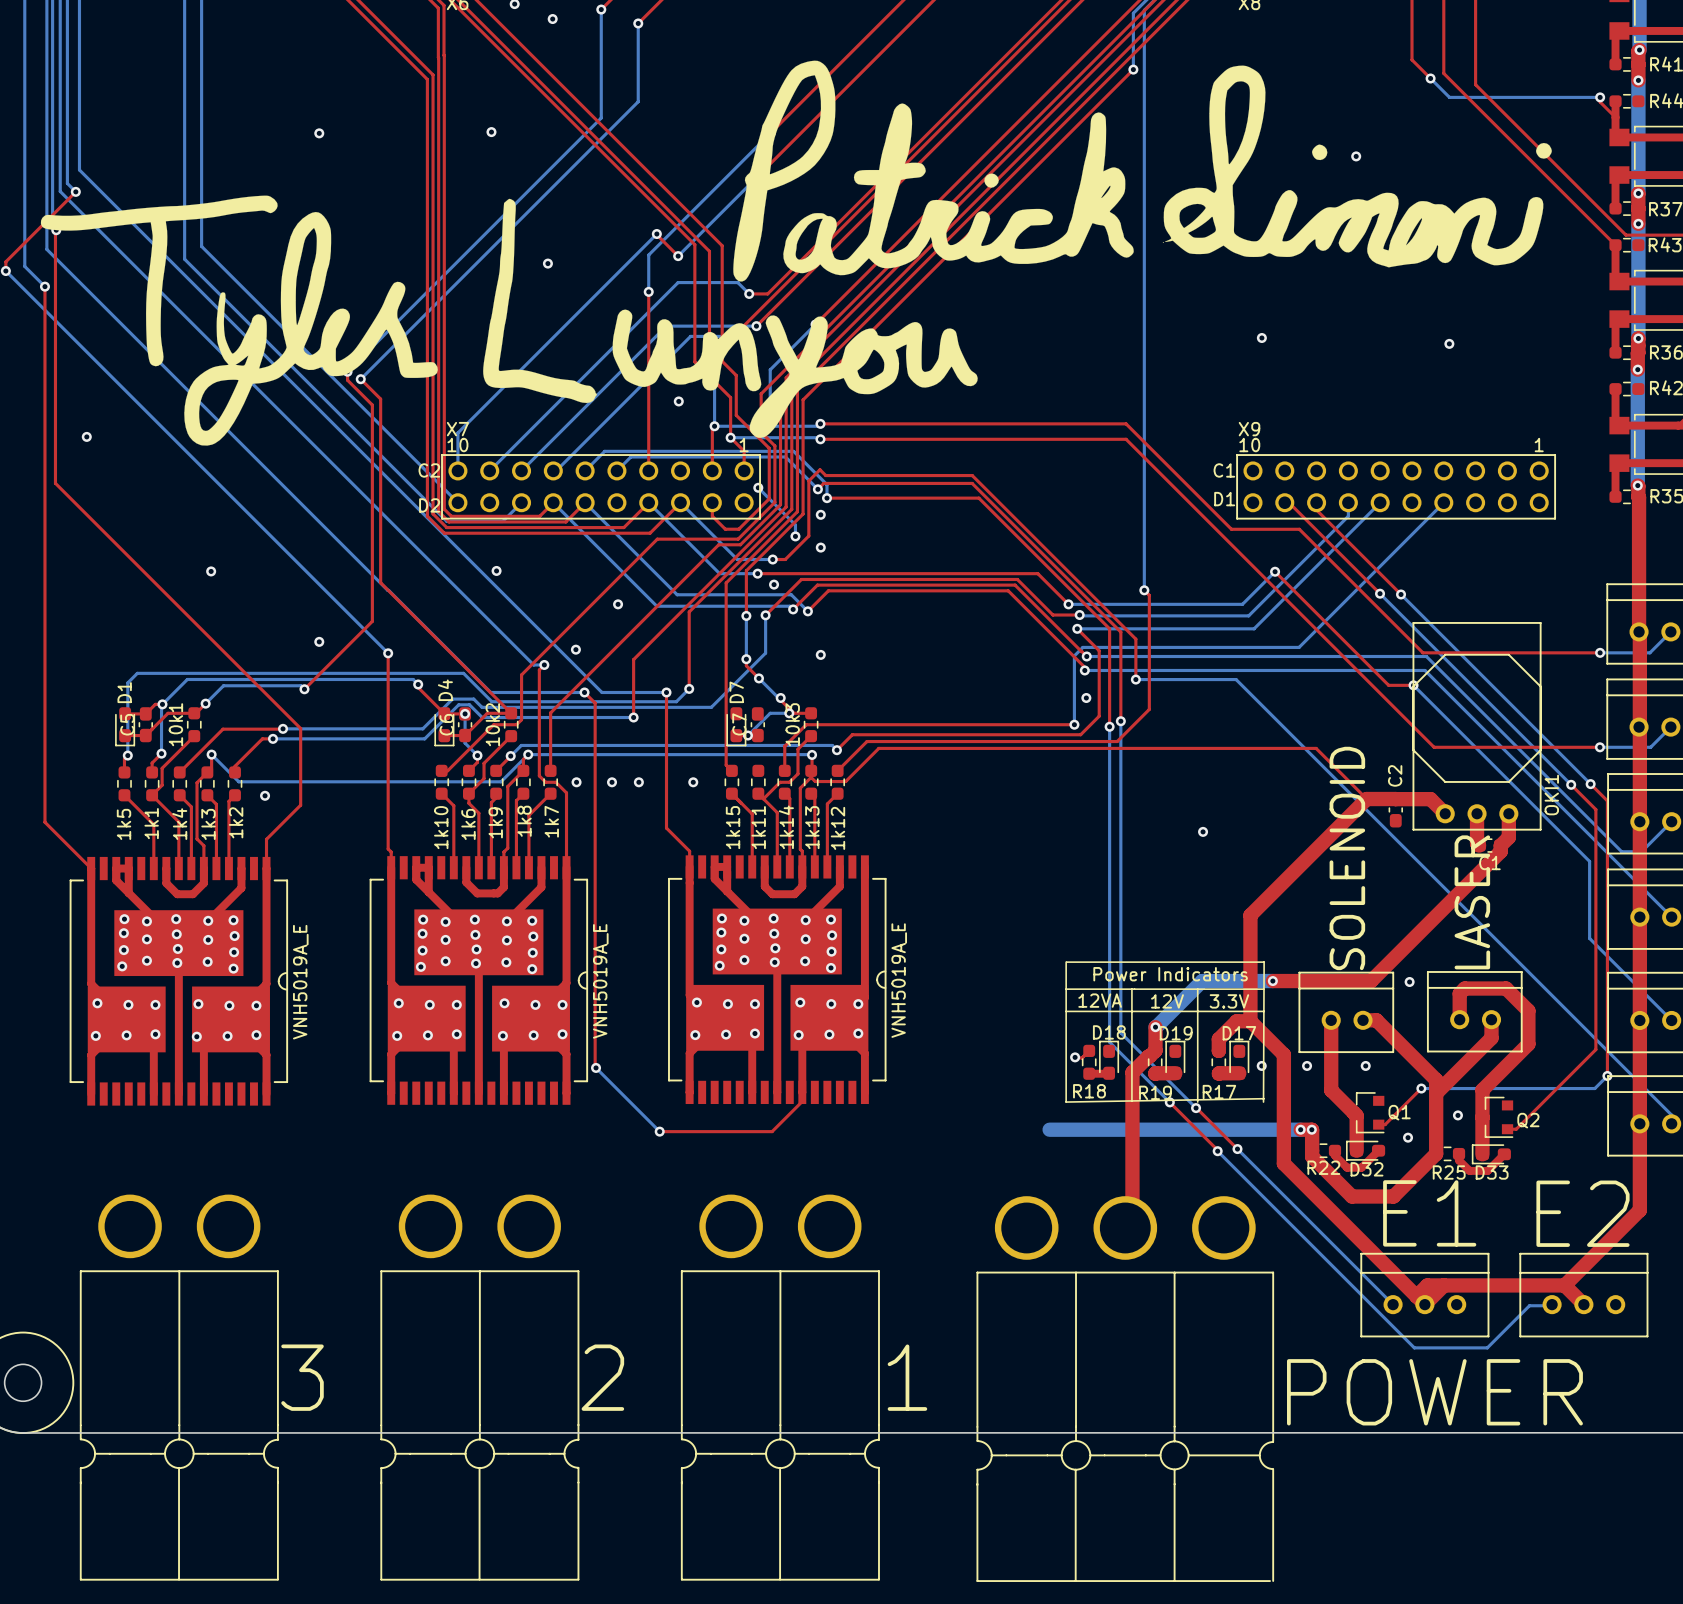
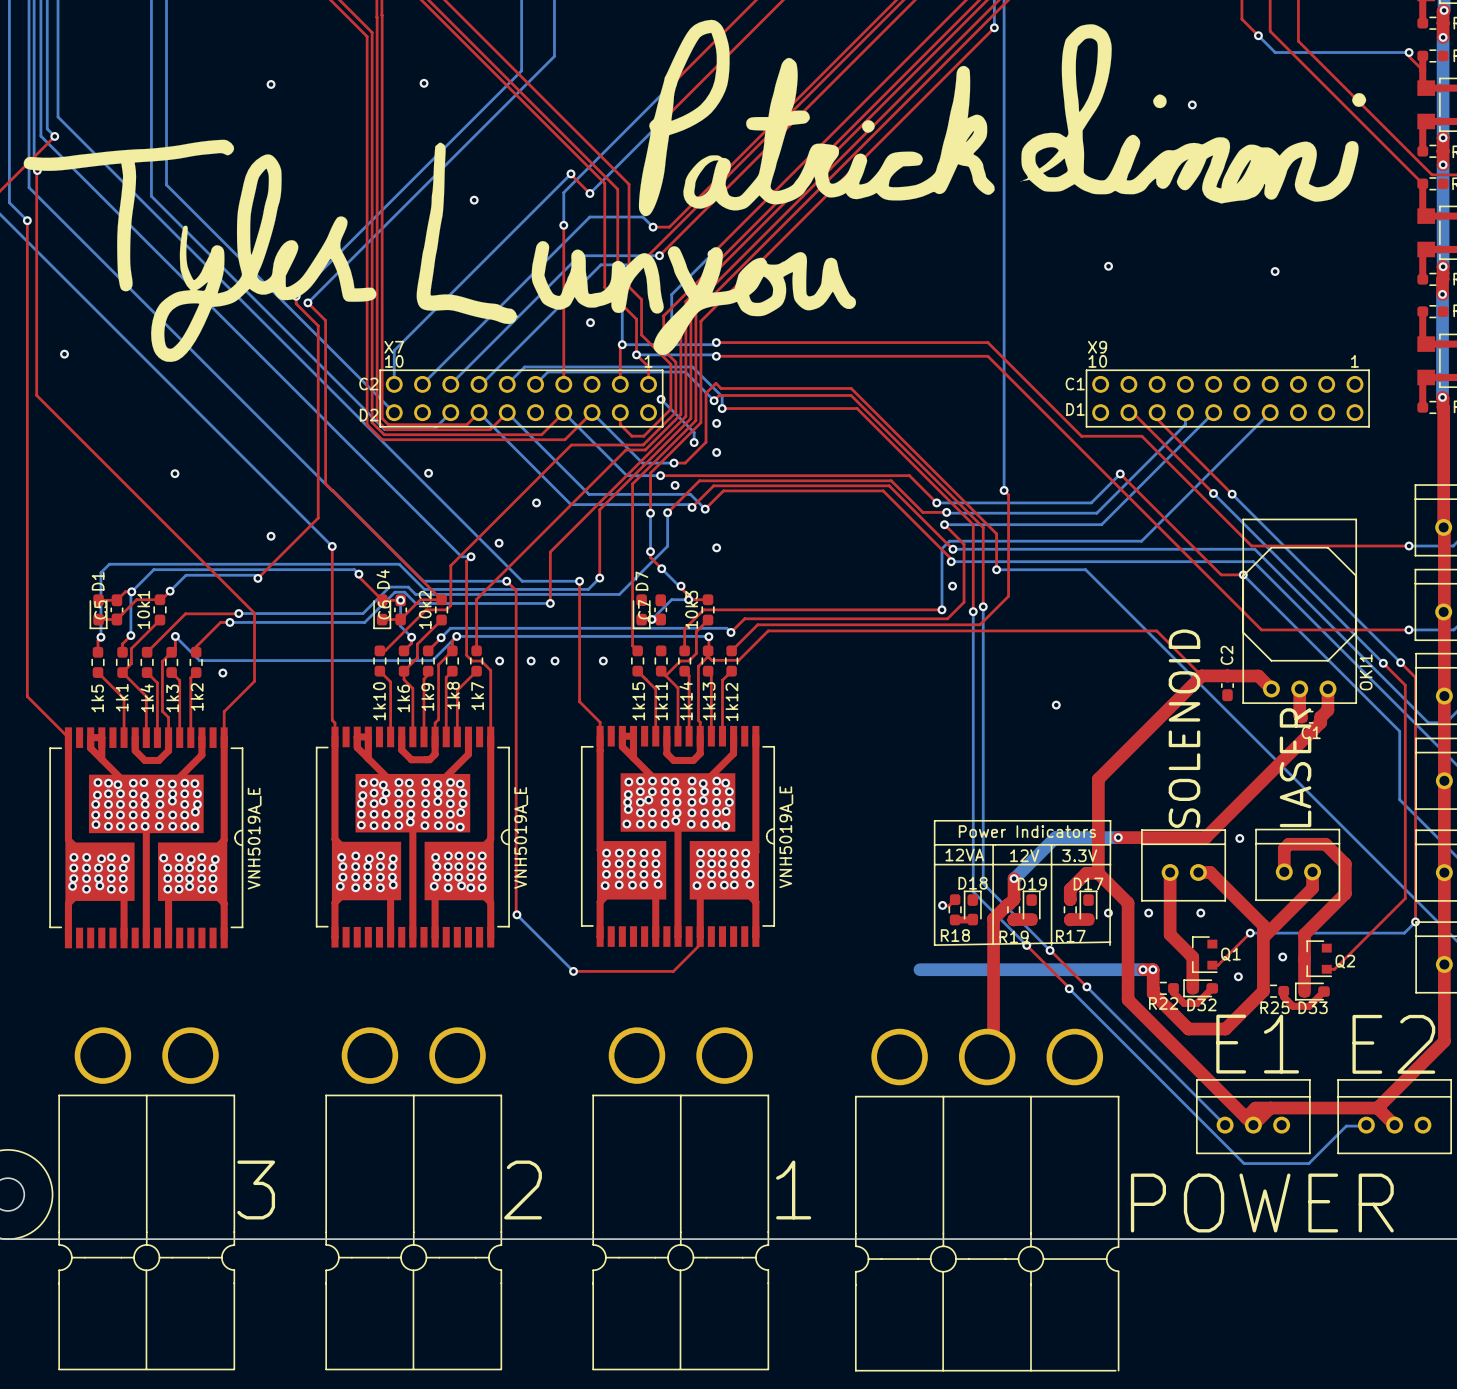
via: none -> (640, 781)
via: none -> (652, 781)
via: none -> (665, 781)
via: none -> (692, 781)
via: none -> (716, 781)
via: none -> (108, 783)
via: none -> (133, 783)
via: none -> (160, 783)
via: none -> (184, 783)
via: none -> (374, 782)
via: none -> (398, 782)
via: none -> (425, 782)
via: none -> (450, 782)
via: (744, 920) -> none
via: none -> (640, 791)
via: none -> (652, 791)
via: none -> (665, 791)
via: none -> (677, 791)
via: none -> (691, 791)
via: none -> (704, 791)
via: none -> (716, 791)
via: none -> (729, 791)
via: none -> (374, 793)
via: none -> (386, 793)
via: none -> (398, 793)
via: none -> (410, 793)
via: none -> (425, 793)
via: none -> (438, 793)
via: none -> (450, 793)
via: none -> (463, 793)
via: none -> (108, 793)
via: none -> (120, 793)
via: none -> (133, 793)
via: none -> (160, 793)
via: none -> (172, 793)
via: none -> (184, 793)
via: none -> (197, 793)
via: (774, 933) -> none
via: (475, 934) -> none
via: (832, 935) -> none
via: (234, 936) -> none
via: (533, 936) -> none
via: (146, 939) -> none
via: none -> (627, 802)
via: none -> (640, 802)
via: none -> (665, 802)
via: none -> (677, 802)
via: none -> (691, 802)
via: none -> (716, 802)
via: none -> (729, 802)
via: none -> (361, 803)
via: none -> (374, 803)
via: none -> (398, 803)
via: none -> (410, 803)
via: none -> (425, 803)
via: none -> (450, 803)
via: none -> (463, 803)
via: none -> (95, 804)
via: none -> (108, 804)
via: none -> (120, 804)
via: none -> (133, 804)
via: none -> (145, 804)
via: none -> (160, 804)
via: none -> (184, 804)
via: none -> (197, 804)
via: (177, 948) -> none
via: (775, 948) -> none
via: (476, 949) -> none
via: (123, 950) -> none
via: (422, 950) -> none
via: none -> (640, 812)
via: none -> (652, 812)
via: none -> (665, 812)
via: none -> (677, 812)
via: none -> (691, 812)
via: none -> (704, 812)
via: none -> (716, 812)
via: none -> (361, 814)
via: none -> (374, 814)
via: none -> (386, 814)
via: none -> (398, 814)
via: none -> (410, 814)
via: none -> (425, 814)
via: none -> (438, 814)
via: none -> (450, 814)
via: none -> (95, 815)
via: none -> (108, 815)
via: none -> (120, 815)
via: none -> (133, 815)
via: none -> (145, 815)
via: none -> (160, 815)
via: none -> (172, 815)
via: none -> (184, 815)
via: (146, 960) -> none
via: (744, 960) -> none
via: (207, 961) -> none
via: (445, 961) -> none
via: (805, 961) -> none
via: (506, 962) -> none
via: (177, 963) -> none
via: none -> (640, 824)
via: none -> (652, 824)
via: none -> (665, 824)
via: none -> (691, 824)
via: none -> (704, 824)
via: none -> (716, 824)
via: none -> (374, 825)
via: none -> (386, 825)
via: none -> (398, 825)
via: none -> (424, 825)
via: none -> (438, 825)
via: none -> (450, 825)
via: none -> (108, 826)
via: none -> (120, 826)
via: none -> (133, 826)
via: none -> (145, 826)
via: none -> (159, 826)
via: none -> (172, 826)
via: none -> (184, 826)
via: none -> (606, 853)
via: none -> (619, 853)
via: none -> (631, 853)
via: none -> (644, 853)
via: none -> (656, 853)
via: none -> (700, 853)
via: none -> (711, 853)
via: none -> (722, 853)
via: none -> (734, 853)
via: none -> (745, 853)
via: none -> (355, 855)
via: none -> (380, 855)
via: none -> (448, 855)
via: none -> (458, 855)
via: none -> (470, 855)
via: none -> (482, 855)
via: (696, 1002) -> none
via: (800, 1002) -> none
via: none -> (86, 857)
via: none -> (111, 857)
via: none -> (179, 857)
via: none -> (201, 857)
via: (535, 1004) -> none
via: (562, 1004) -> none
via: (727, 1004) -> none
via: (754, 1004) -> none
via: (831, 1004) -> none
via: (858, 1004) -> none
via: none -> (606, 863)
via: none -> (619, 863)
via: none -> (631, 863)
via: none -> (643, 863)
via: none -> (655, 863)
via: none -> (700, 863)
via: none -> (711, 863)
via: none -> (722, 863)
via: none -> (734, 863)
via: none -> (745, 863)
via: none -> (342, 866)
via: none -> (355, 866)
via: none -> (367, 866)
via: none -> (380, 866)
via: none -> (392, 866)
via: none -> (436, 866)
via: none -> (448, 866)
via: none -> (458, 866)
via: none -> (470, 866)
via: none -> (482, 866)
via: none -> (73, 867)
via: none -> (86, 867)
via: none -> (98, 867)
via: none -> (111, 867)
via: none -> (123, 867)
via: none -> (167, 867)
via: none -> (179, 867)
via: none -> (189, 867)
via: none -> (201, 867)
via: none -> (212, 867)
via: none -> (606, 874)
via: none -> (619, 874)
via: none -> (631, 874)
via: none -> (643, 874)
via: none -> (655, 874)
via: none -> (700, 874)
via: none -> (711, 874)
via: none -> (722, 874)
via: none -> (734, 874)
via: none -> (745, 874)
via: none -> (342, 877)
via: none -> (355, 877)
via: none -> (367, 877)
via: none -> (380, 877)
via: none -> (392, 877)
via: none -> (436, 877)
via: none -> (448, 877)
via: none -> (458, 877)
via: none -> (470, 877)
via: none -> (482, 877)
via: none -> (73, 878)
via: none -> (86, 878)
via: none -> (98, 878)
via: none -> (111, 878)
via: none -> (123, 878)
via: none -> (167, 878)
via: none -> (179, 878)
via: none -> (189, 878)
via: none -> (201, 878)
via: none -> (212, 878)
via: (155, 1034) -> none
via: (562, 1034) -> none
via: none -> (619, 884)
via: none -> (643, 884)
via: none -> (711, 884)
via: none -> (734, 884)
via: (256, 1035) -> none
via: (196, 1036) -> none
via: none -> (355, 887)
via: none -> (380, 887)
via: none -> (448, 887)
via: none -> (470, 887)
via: none -> (482, 887)
via: none -> (86, 889)
via: none -> (111, 889)
via: none -> (123, 889)
via: none -> (167, 889)
via: none -> (179, 889)
via: none -> (201, 889)
via: none -> (212, 889)

